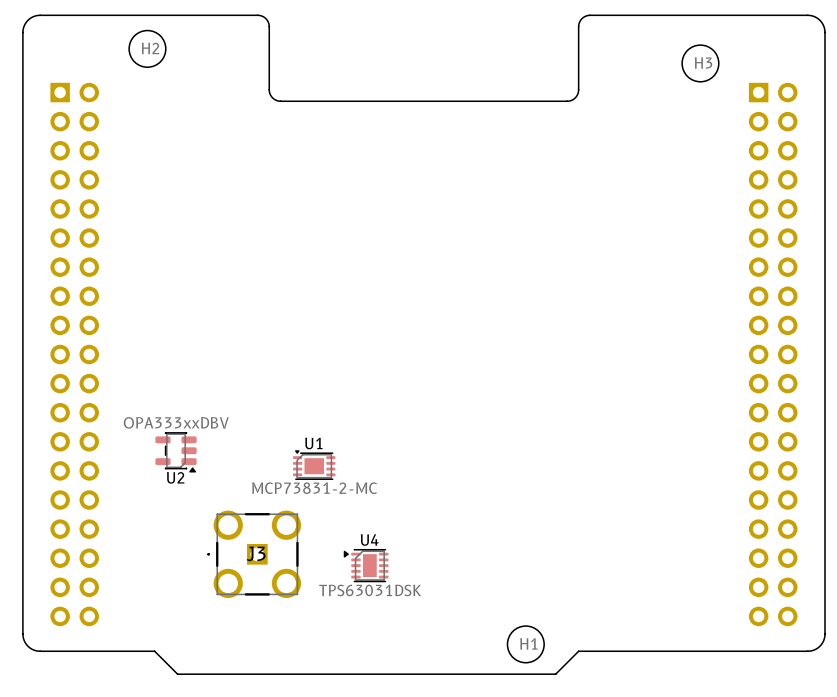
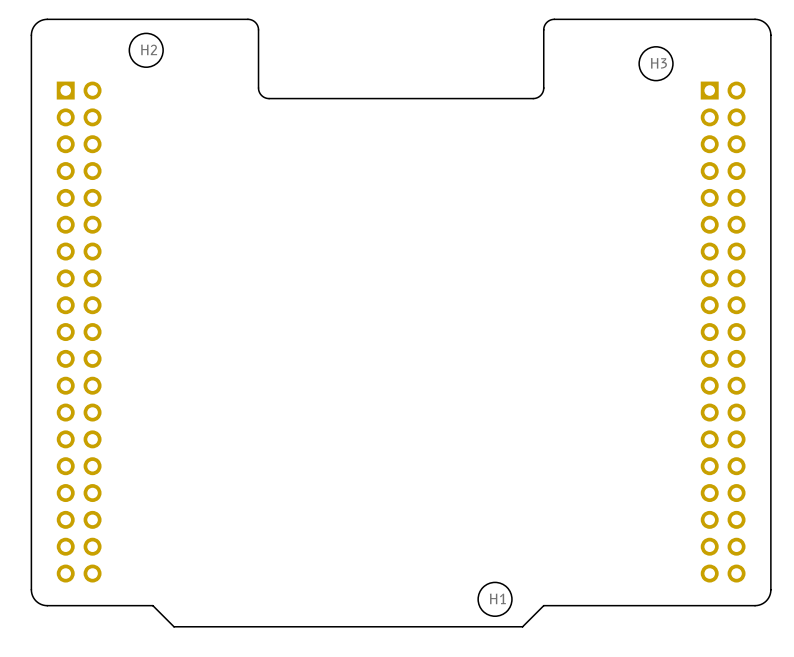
U2: OPA333xxDBV (176, 452) -> none
U1: MCP73831-2-MC (314, 465) -> none
J3: (254, 554) -> none
U4: TPS63031DSK (366, 565) -> none

